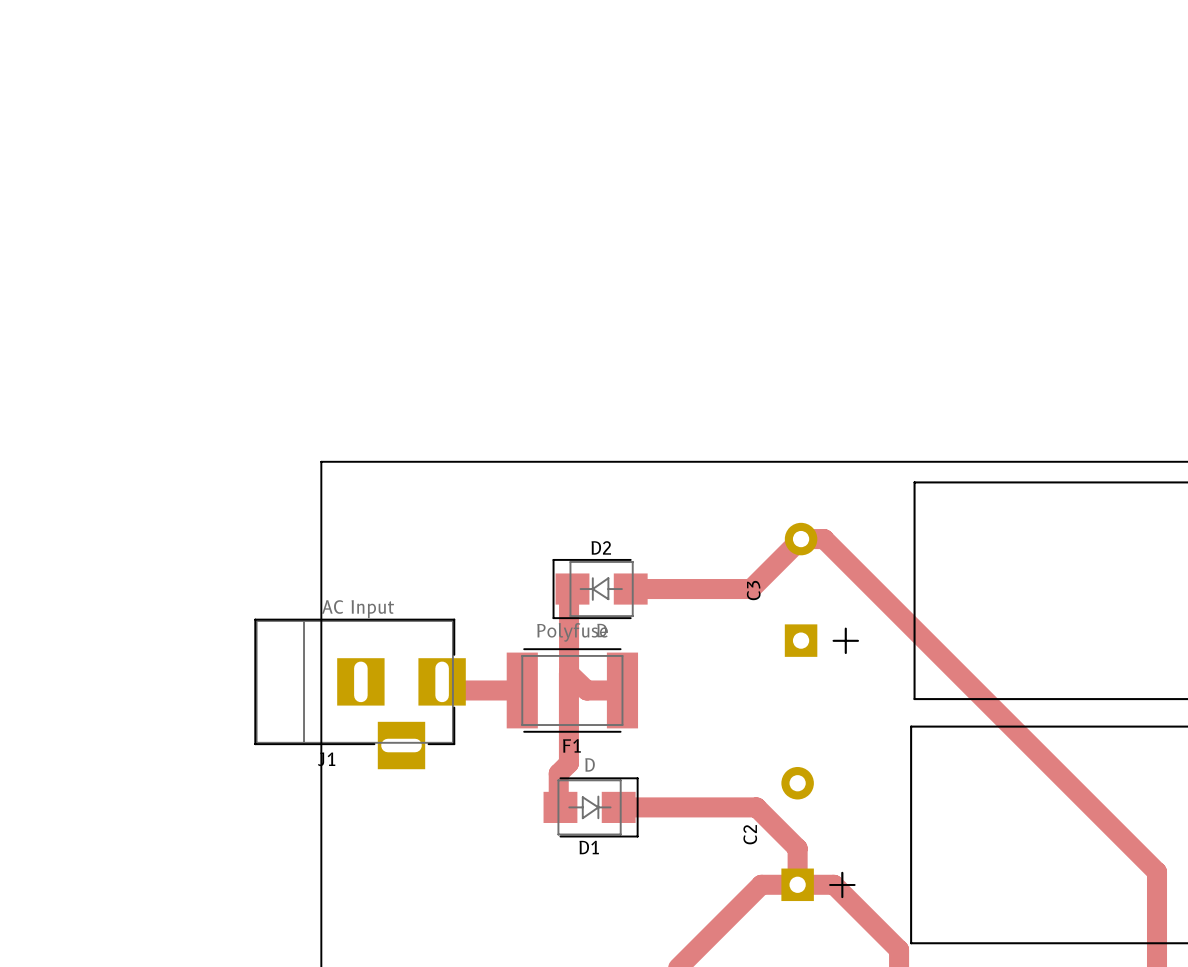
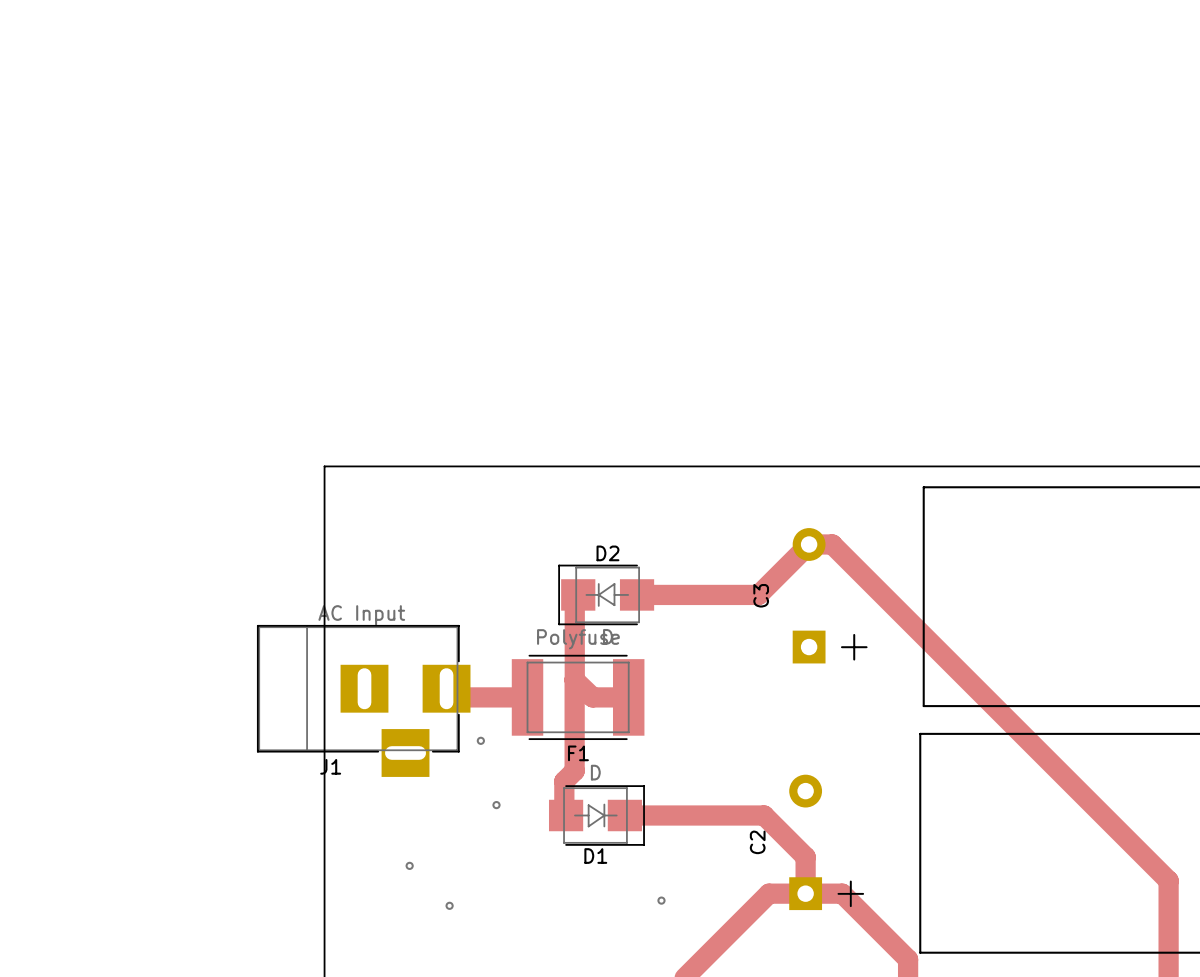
via: none -> (480, 740)
via: none -> (496, 805)
via: none -> (409, 865)
via: none -> (661, 900)
via: none -> (449, 905)

